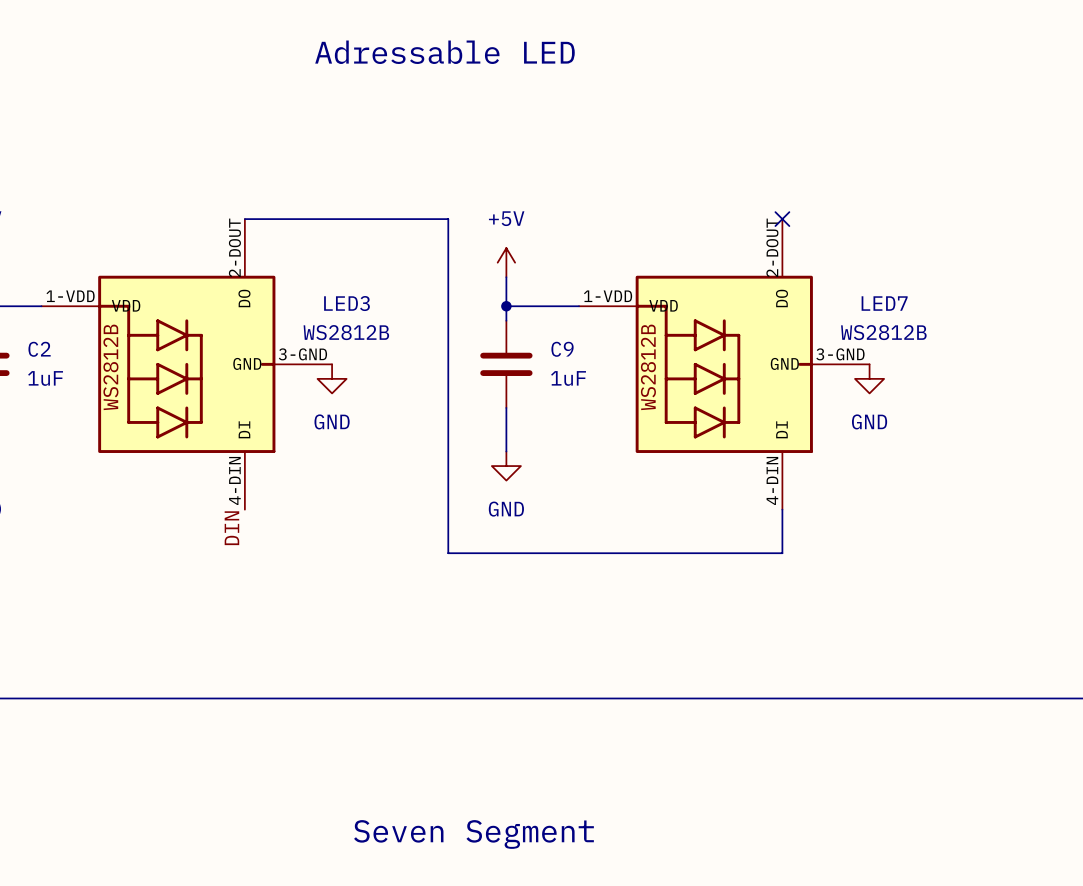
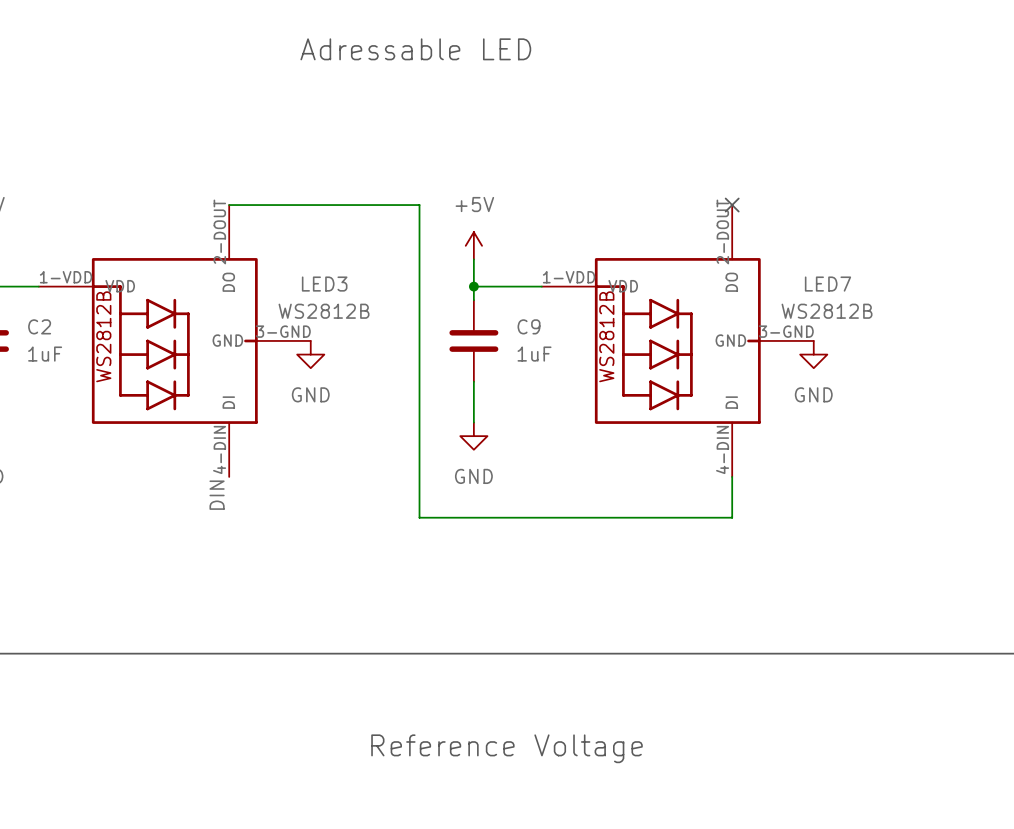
text: none -> Reference Voltage (507, 748)
text: Seven Segment (473, 834) -> none

